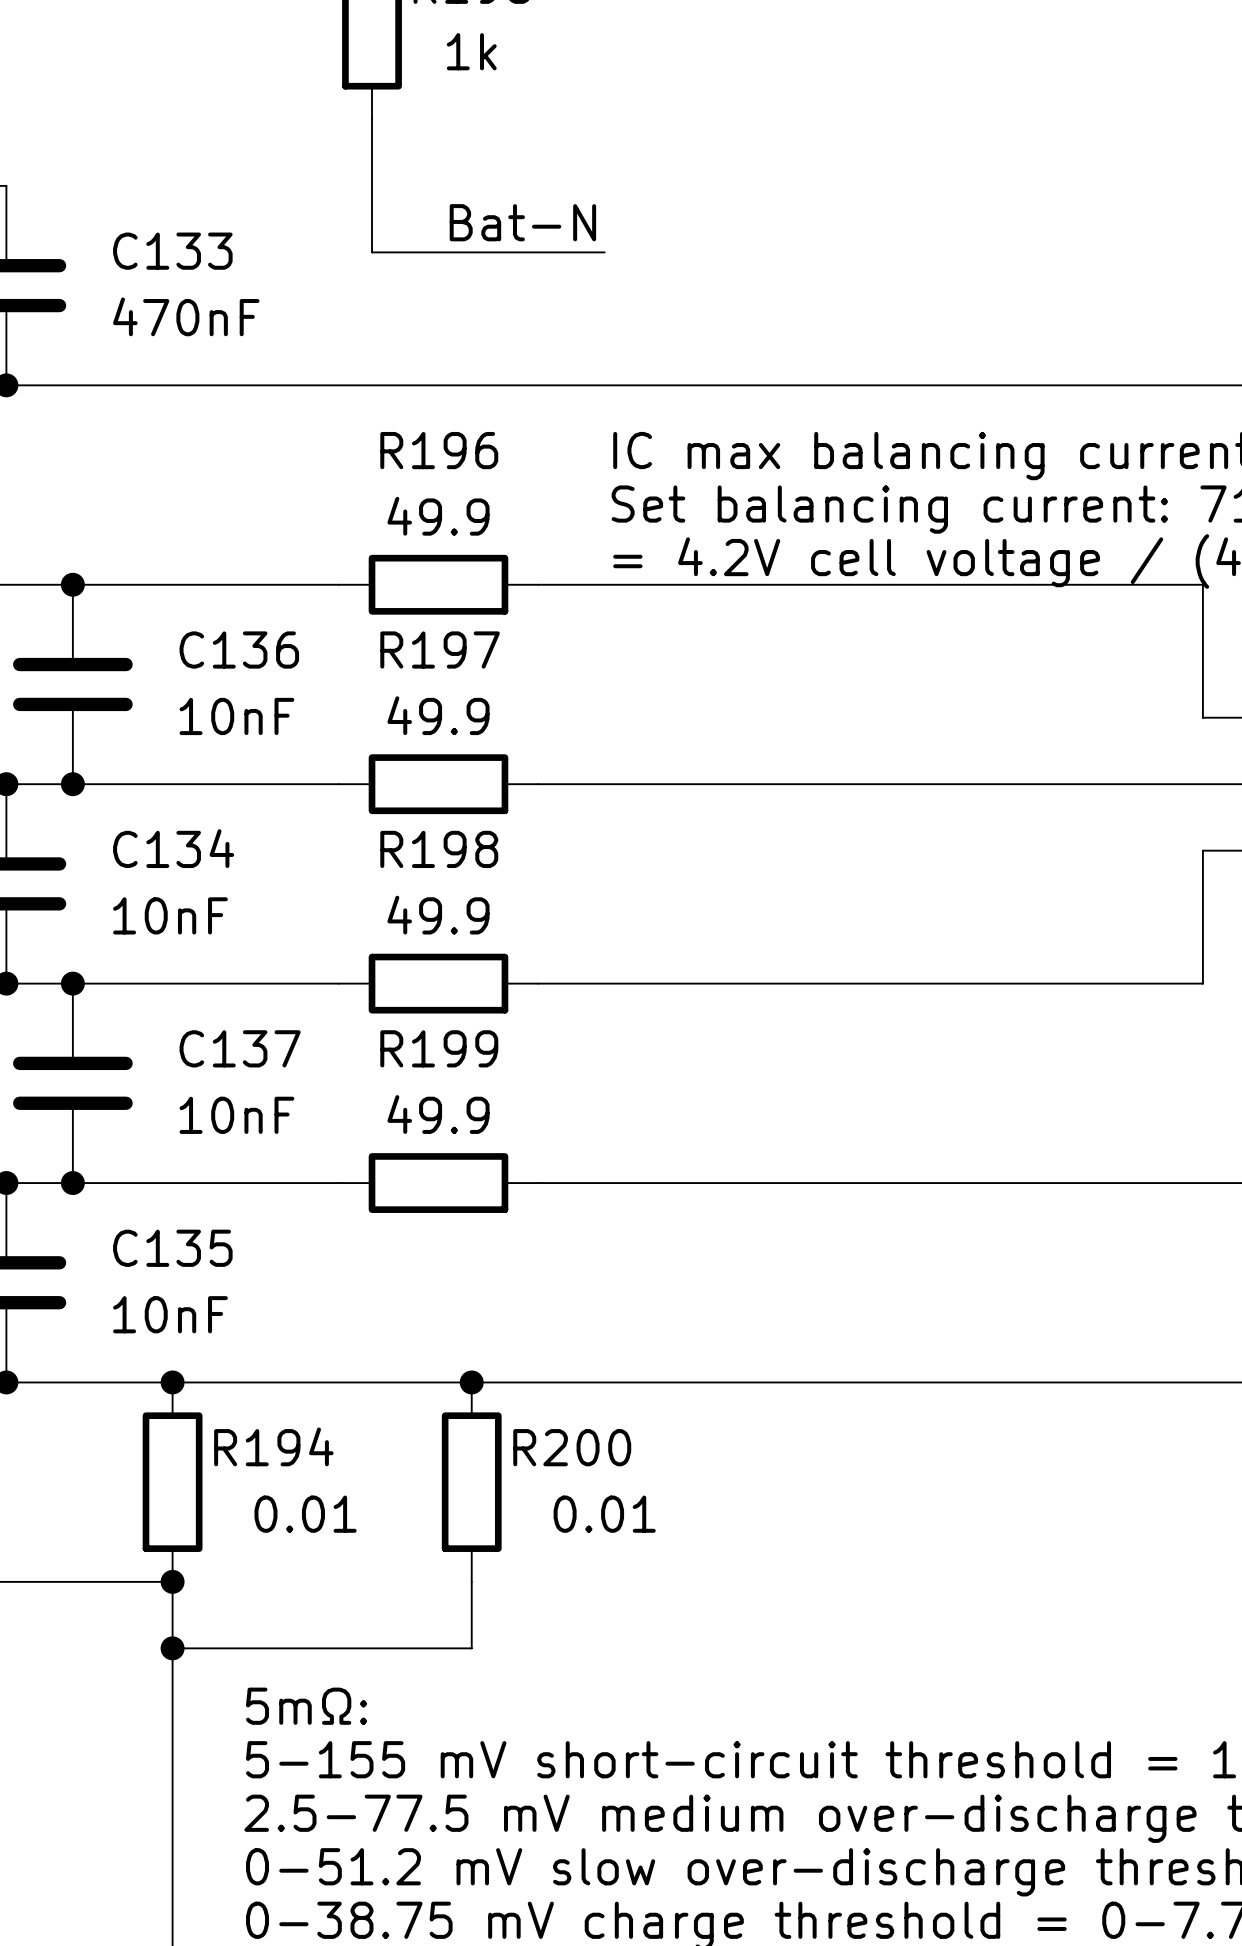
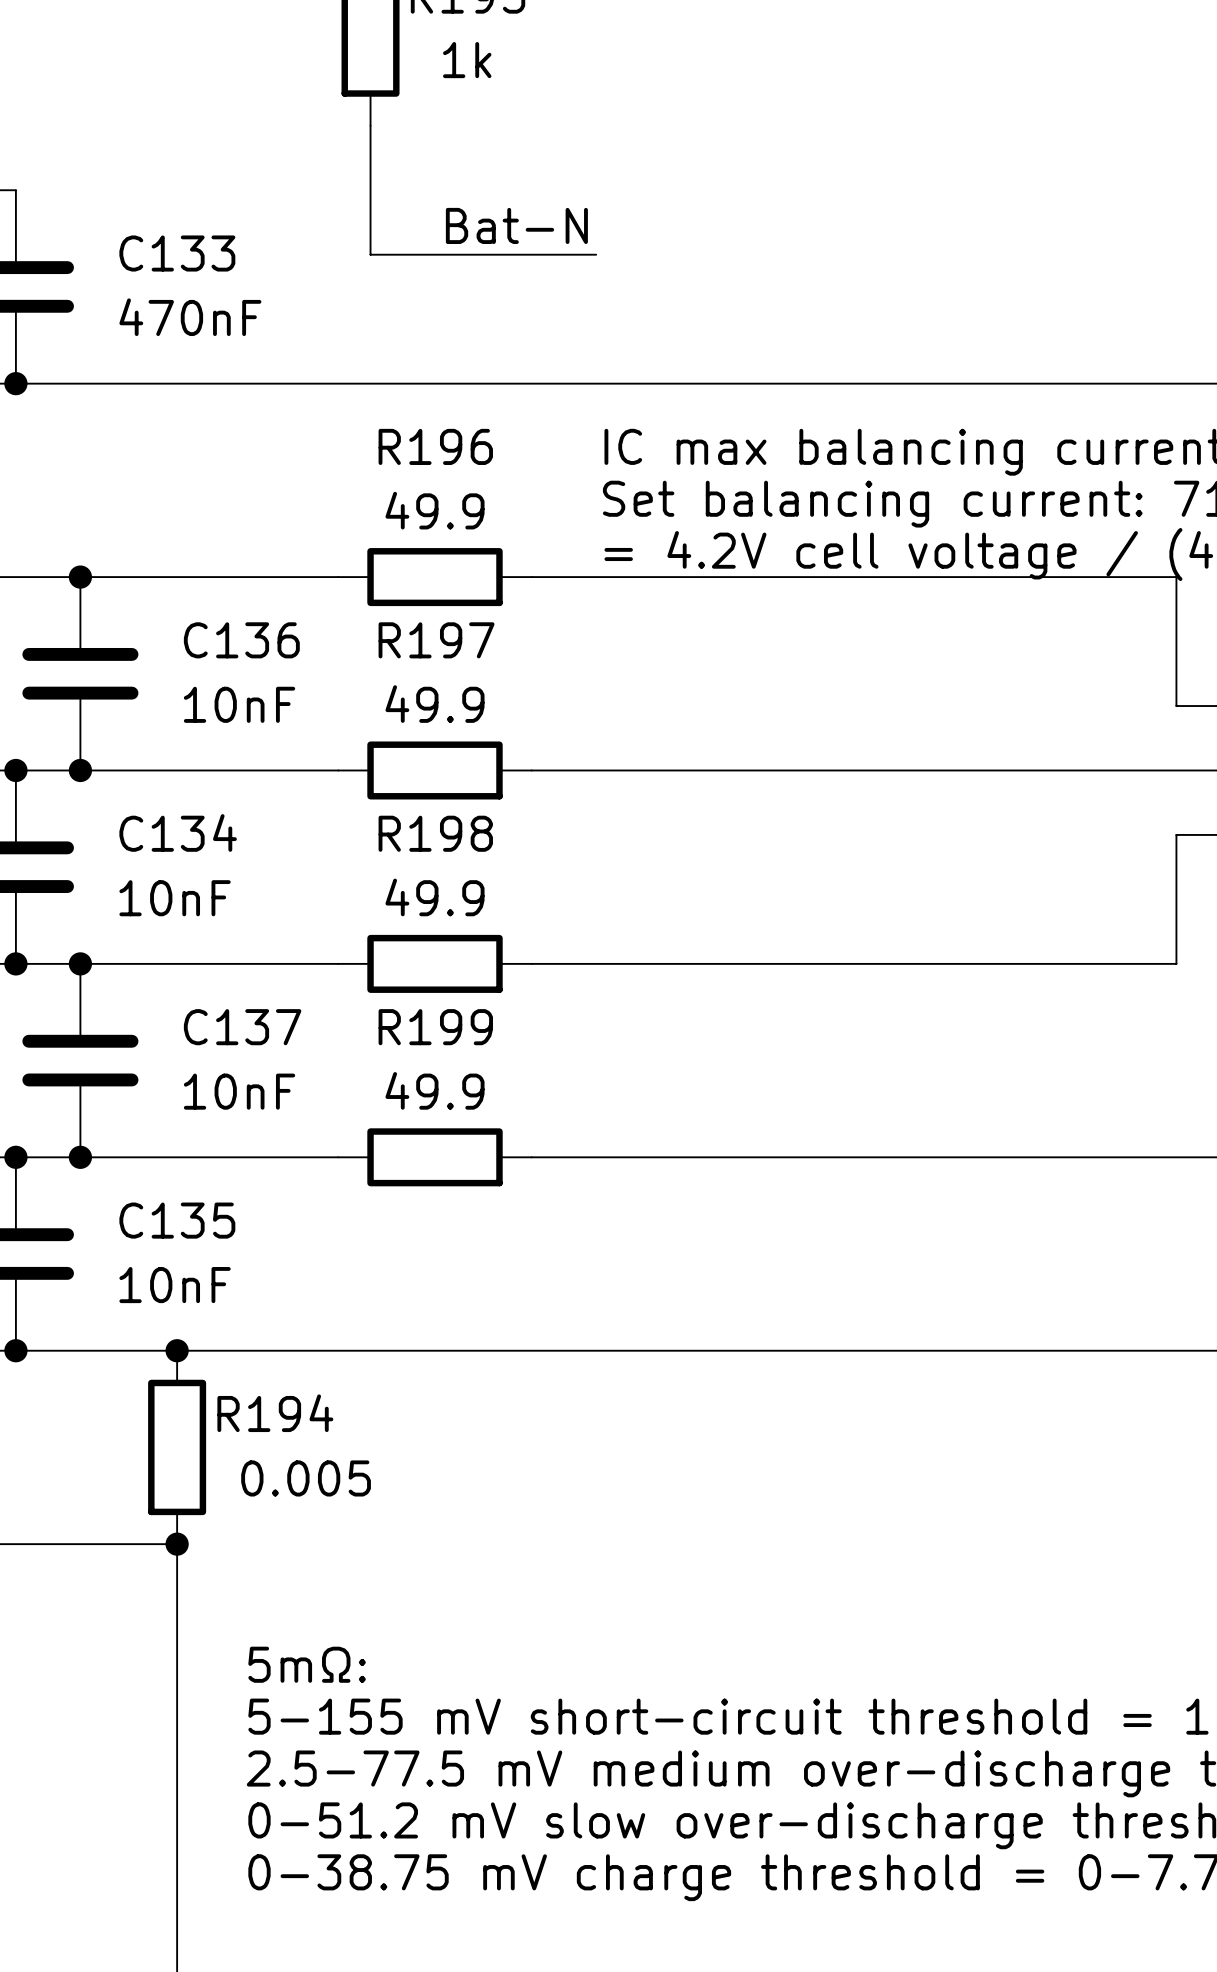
junction: (471, 1382) -> none
R200: 0.01 (471, 1482) -> none
R194 value: 0.01 (305, 1514) -> 0.005 (306, 1478)
wire: (471, 1581) (471, 1648) (172, 1648) -> none
junction: (172, 1648) -> none

